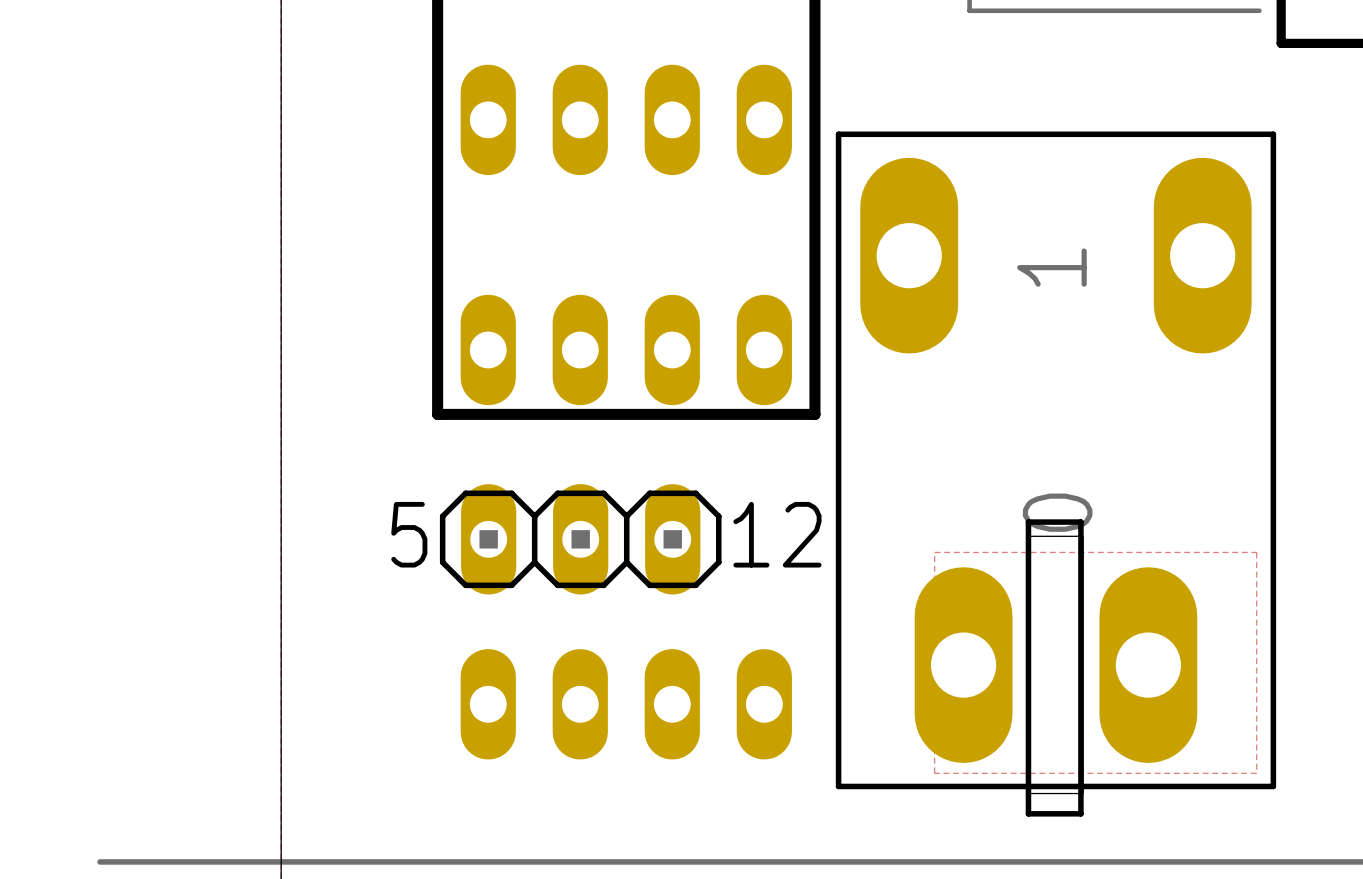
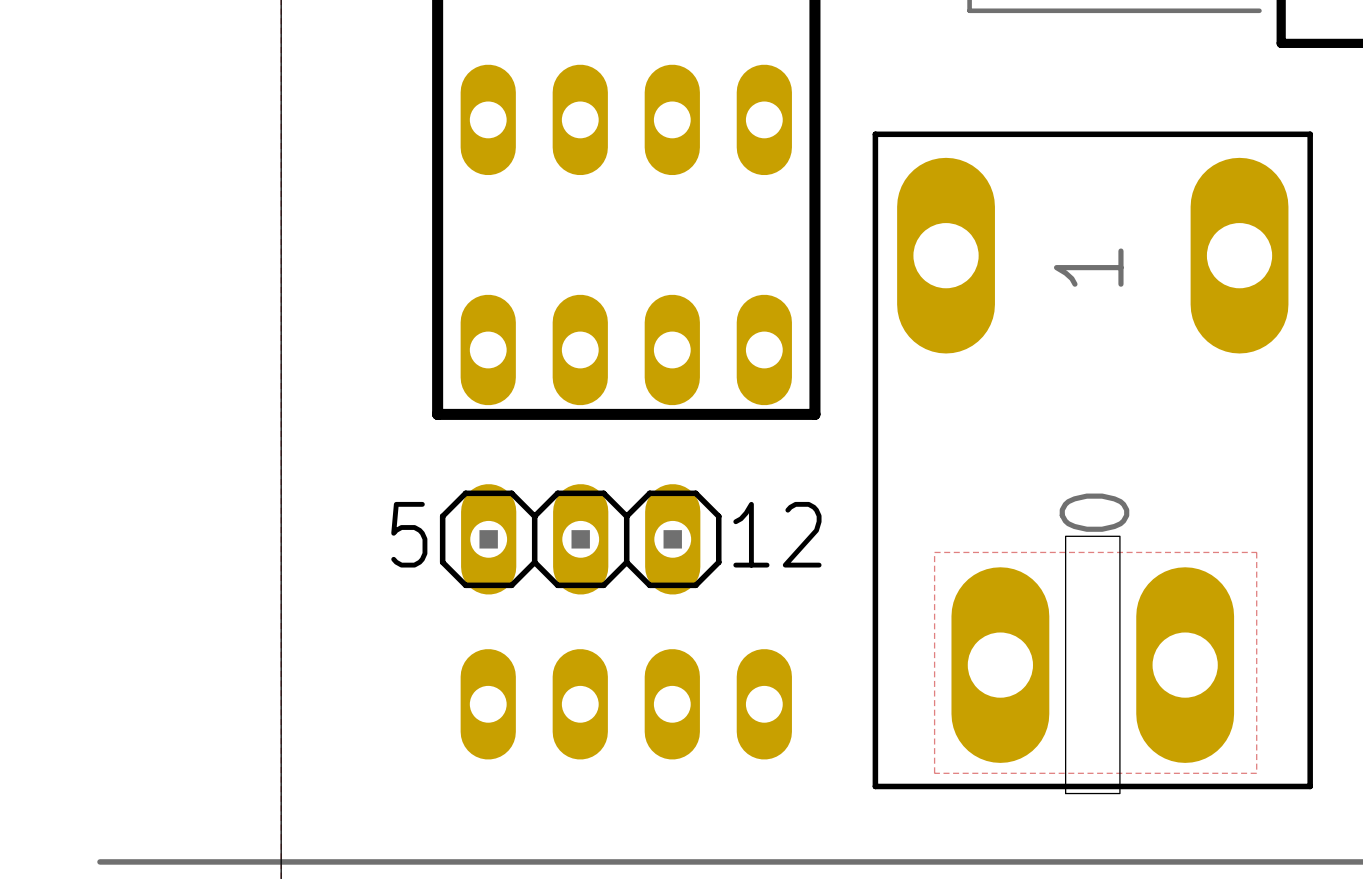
part position: (1055, 462) -> (1092, 462)
board edge: (1028, 522) (1080, 522) (1080, 813) (1028, 813) (1028, 522) -> none

